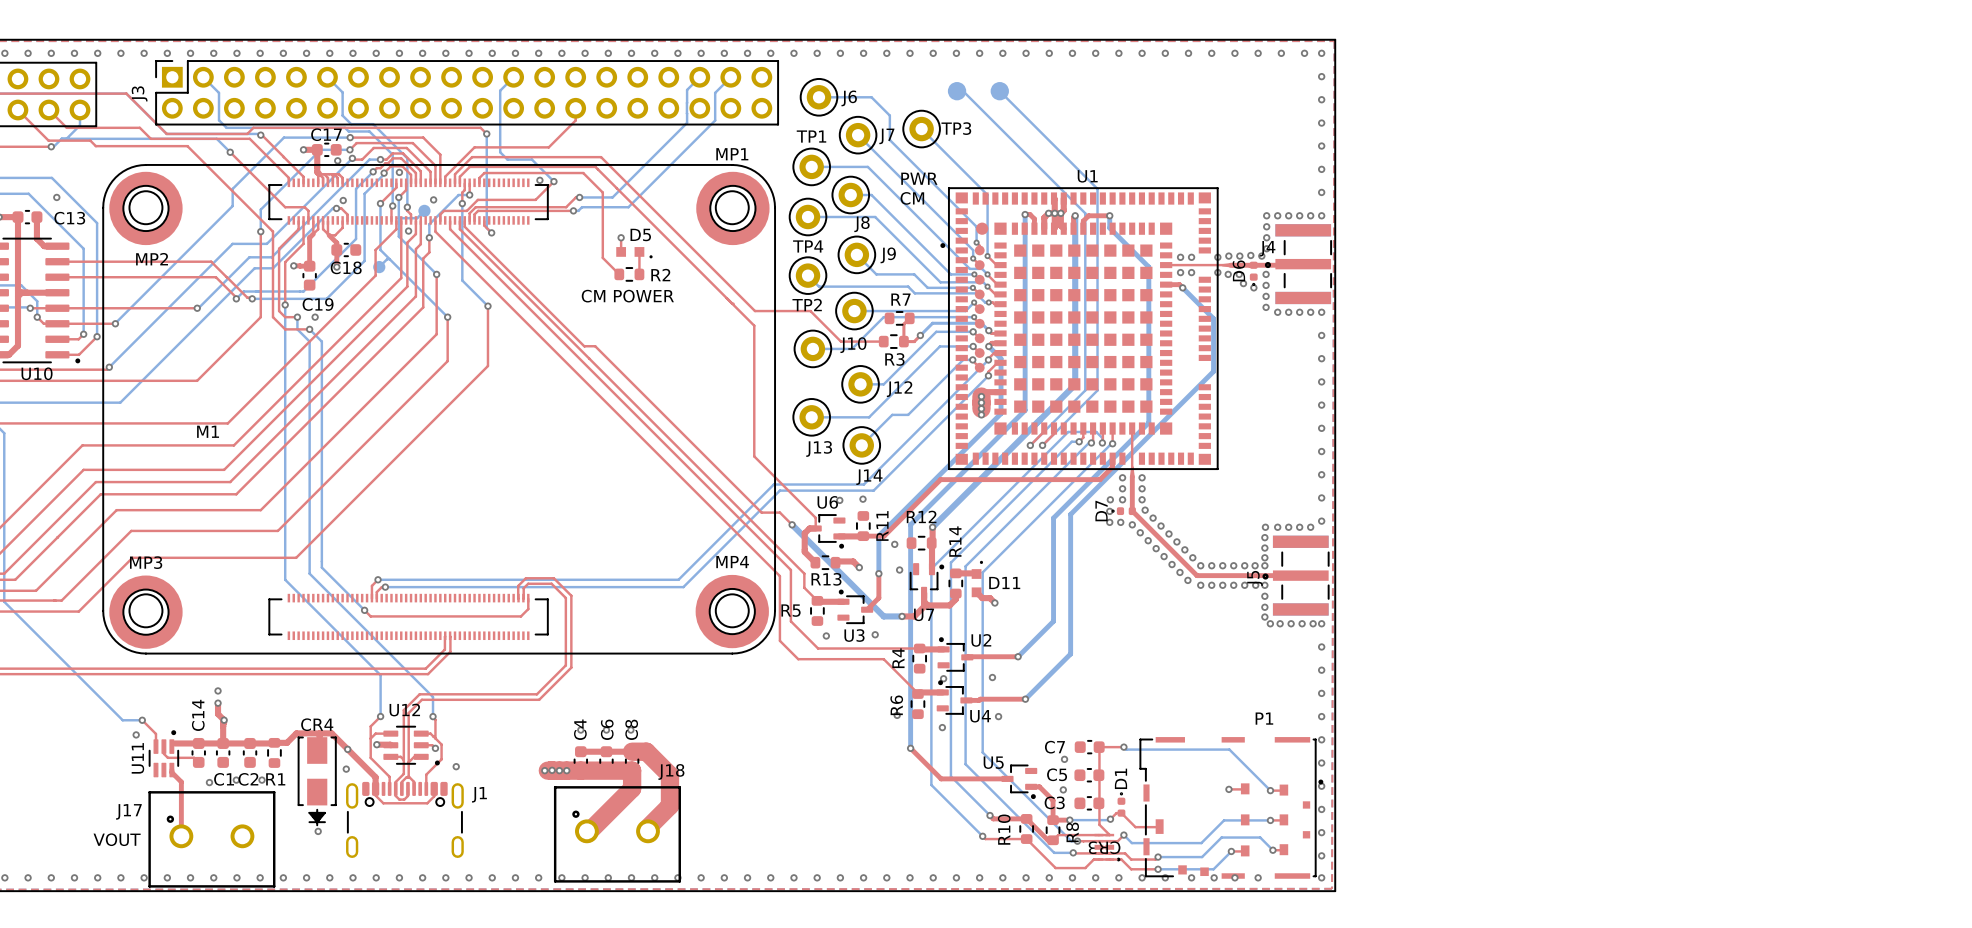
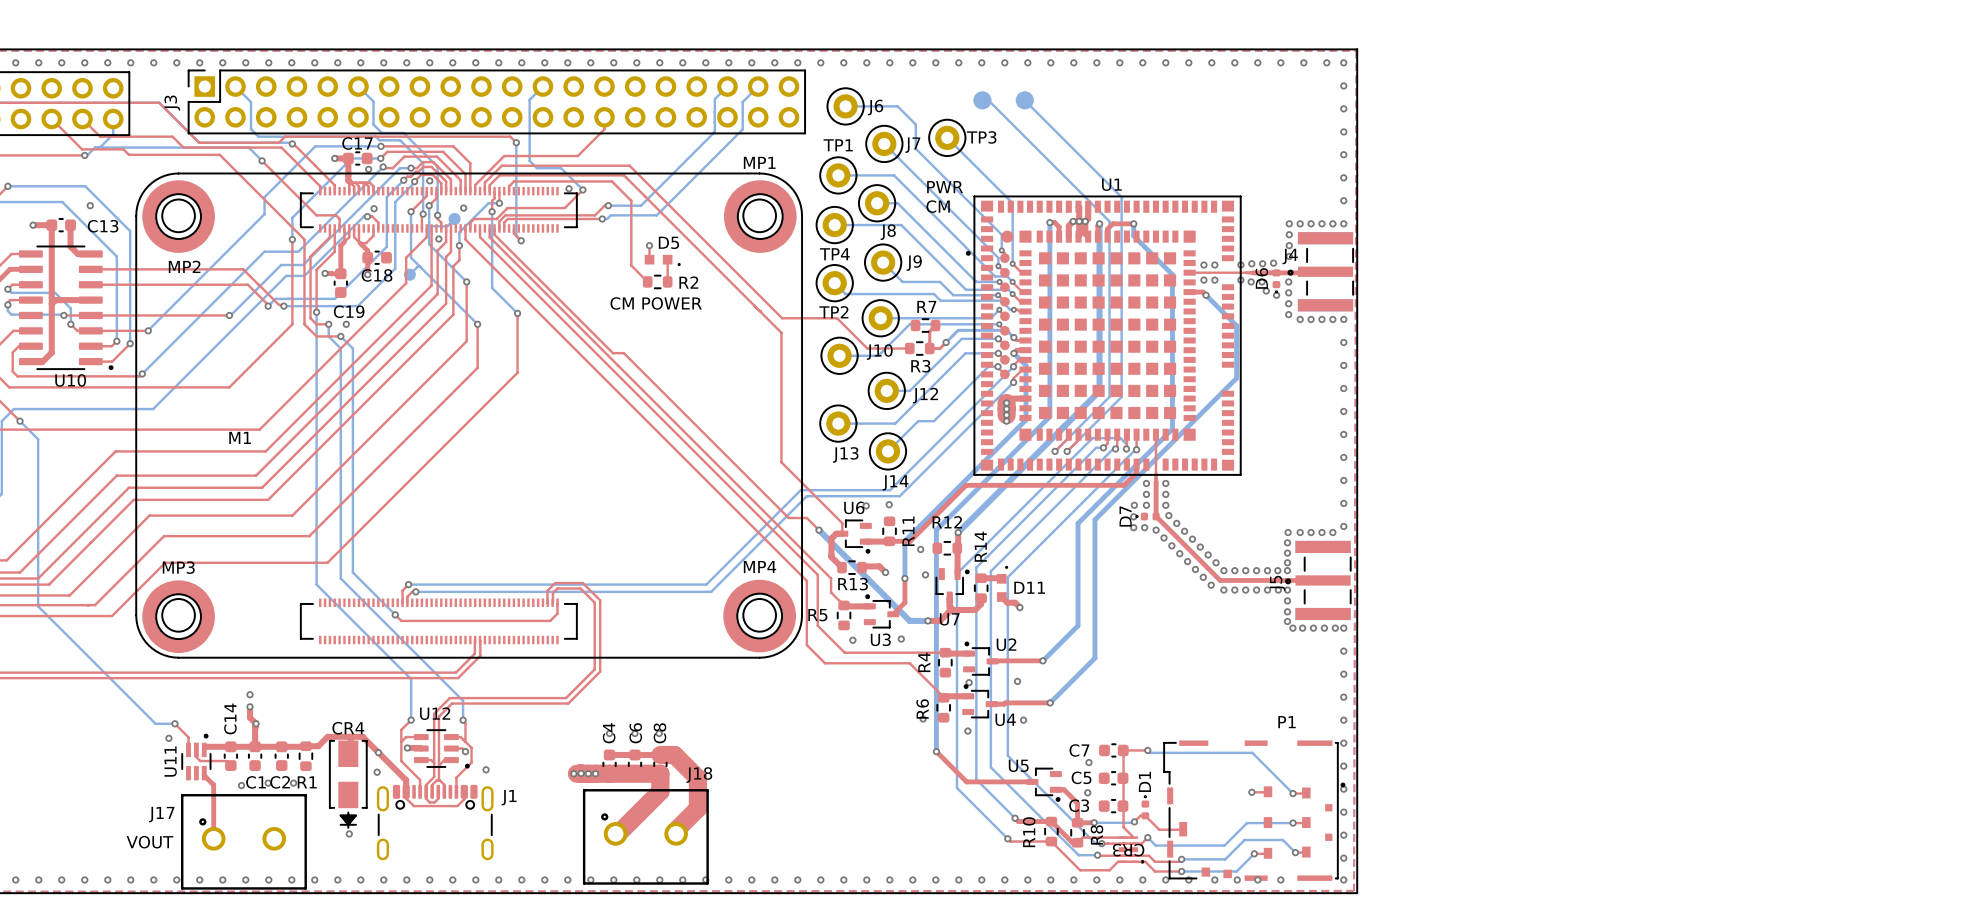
via: (1261, 256) -> none

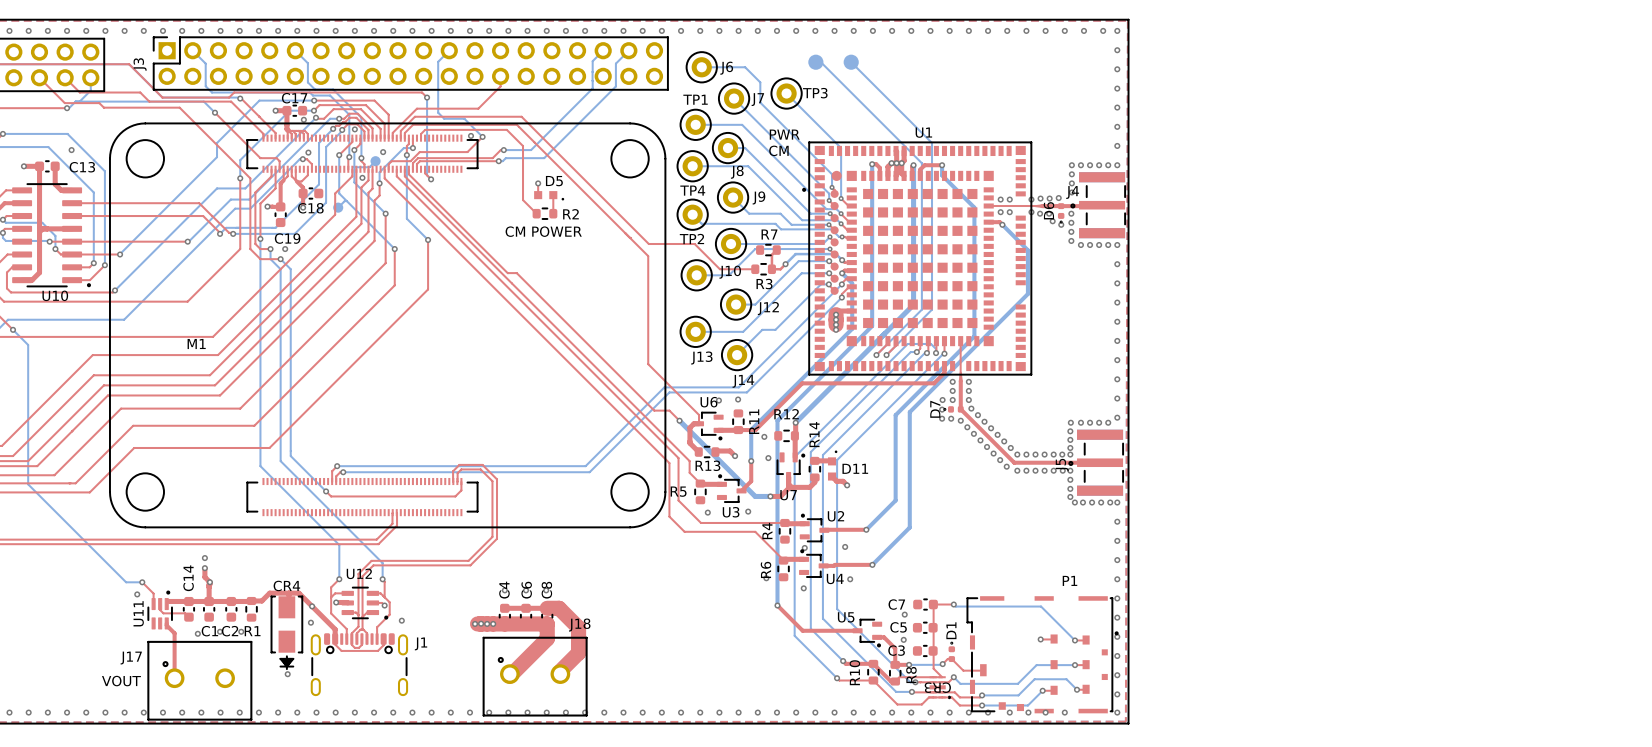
M1 footprint: [135, 172, 803, 659] -> [109, 122, 667, 528]
MP2: (178, 216) -> none
MP1: (760, 216) -> none
MP3: (178, 616) -> none
MP4: (759, 616) -> none

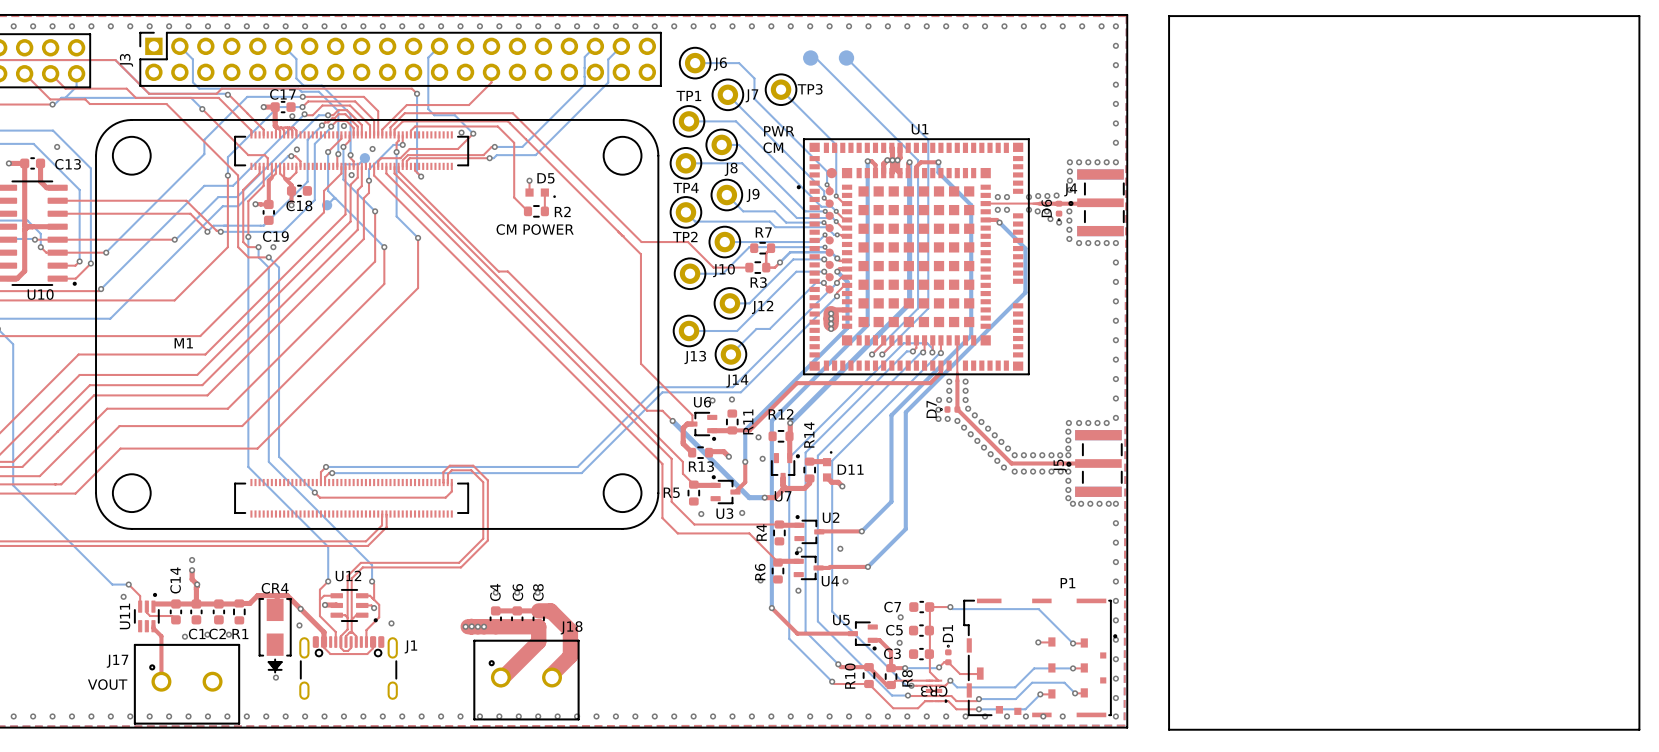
board edge: none -> (1169, 16) (1639, 16) (1639, 729) (1169, 729) (1169, 16)

